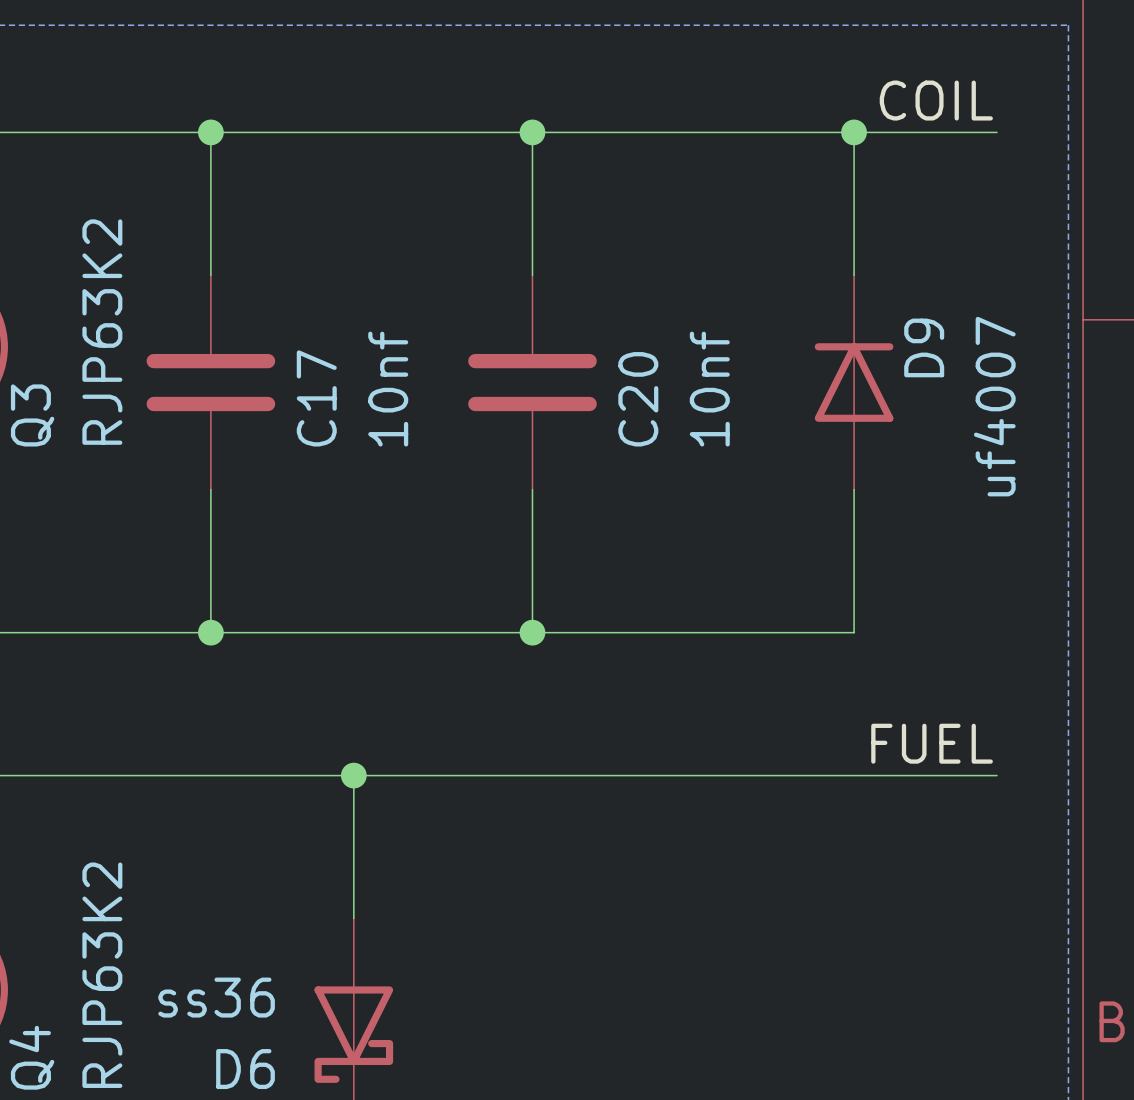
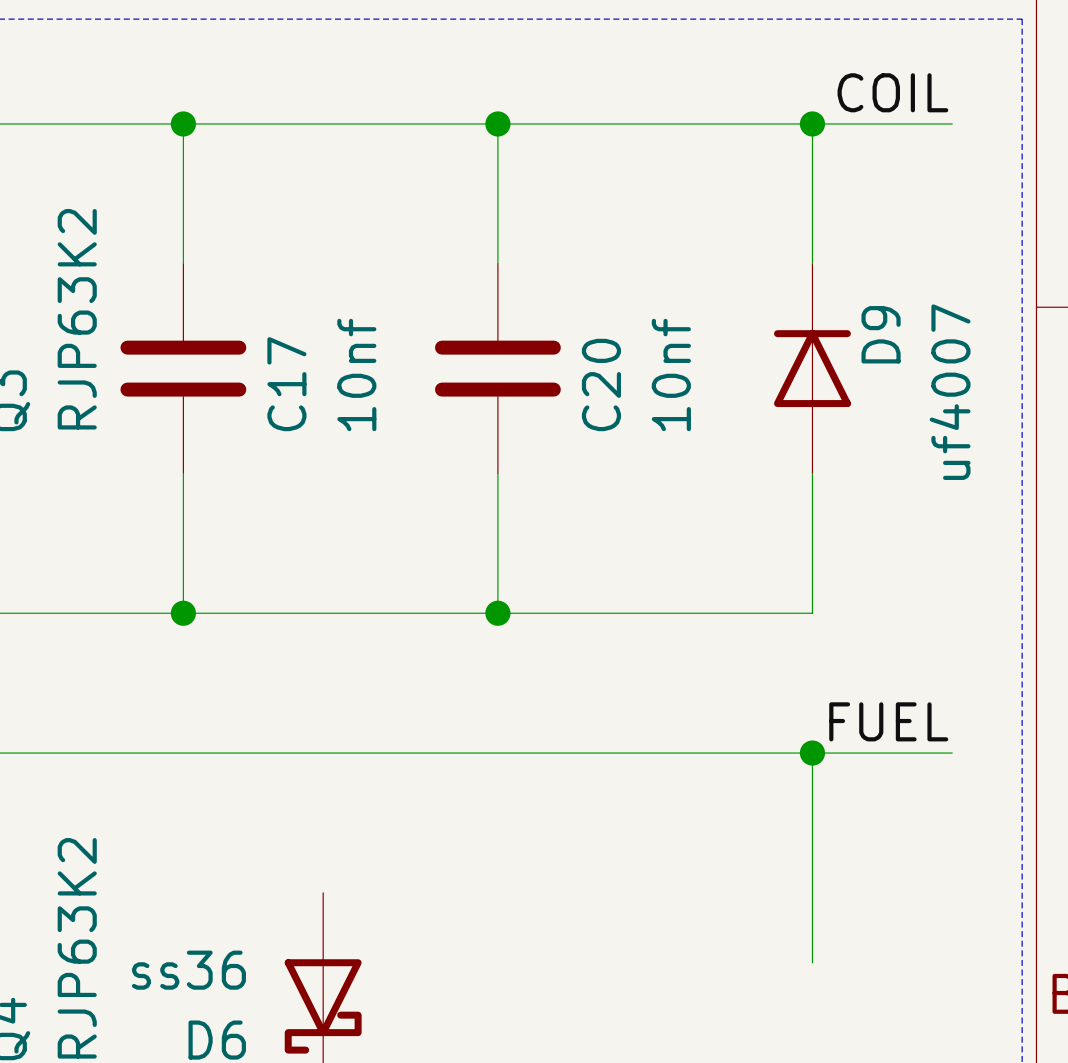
wire: (353, 775) (353, 918) -> none
junction: (353, 775) -> none
wire: none -> (812, 753) (812, 962)
junction: none -> (812, 753)

